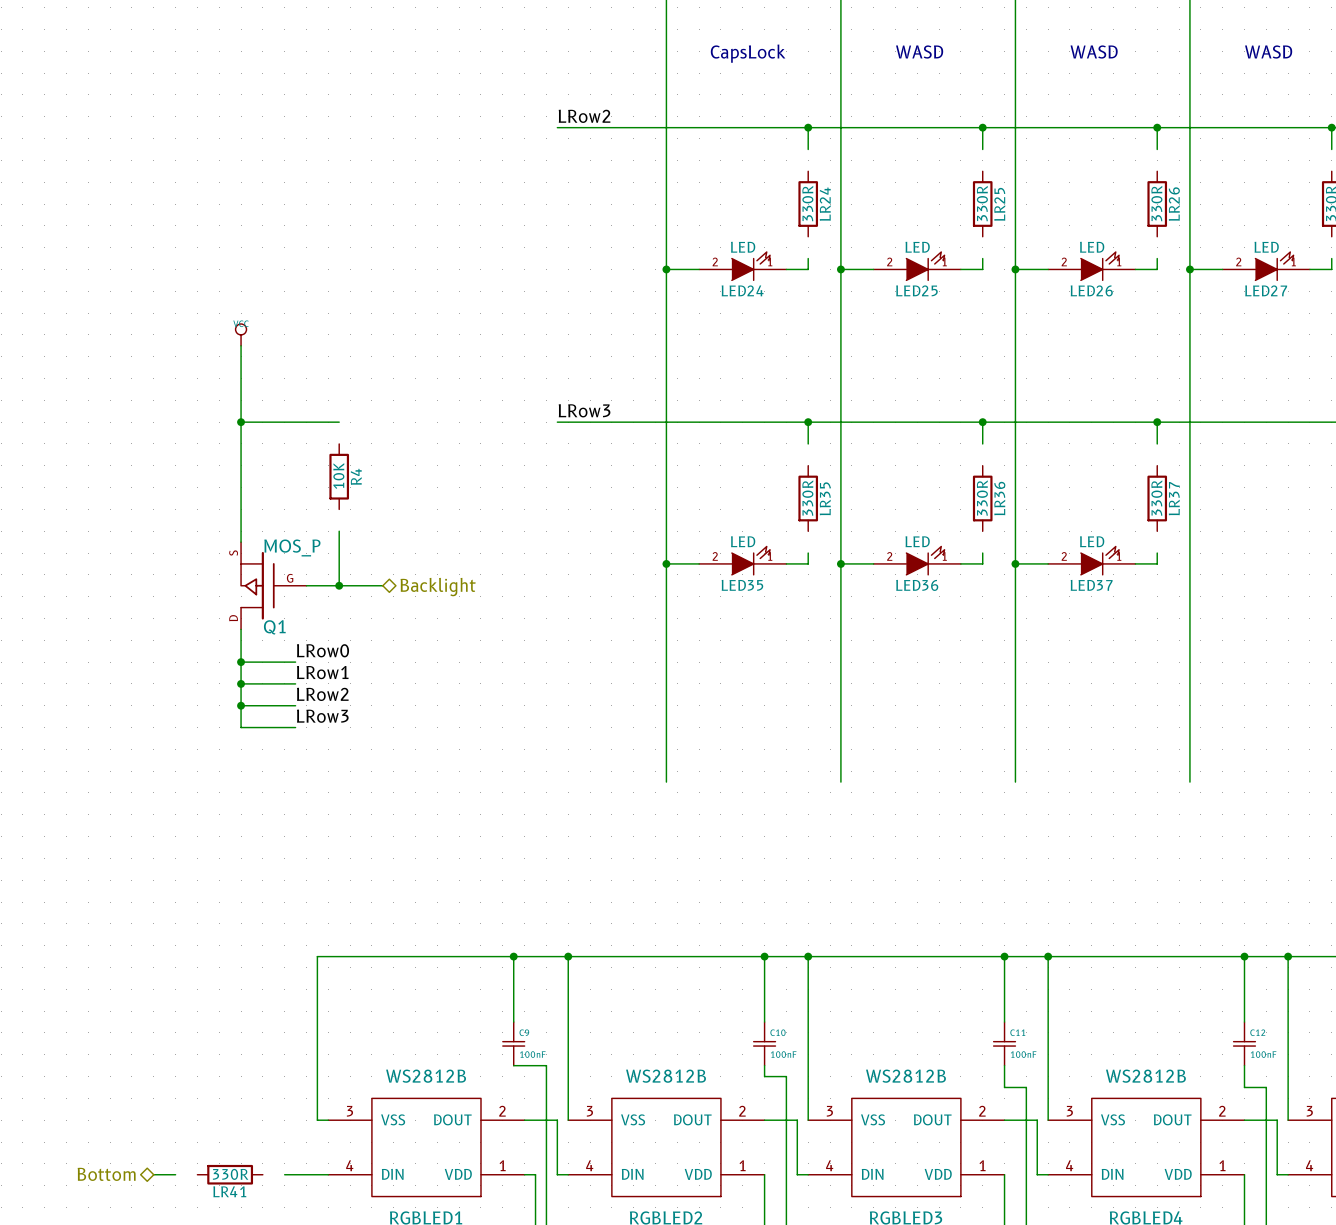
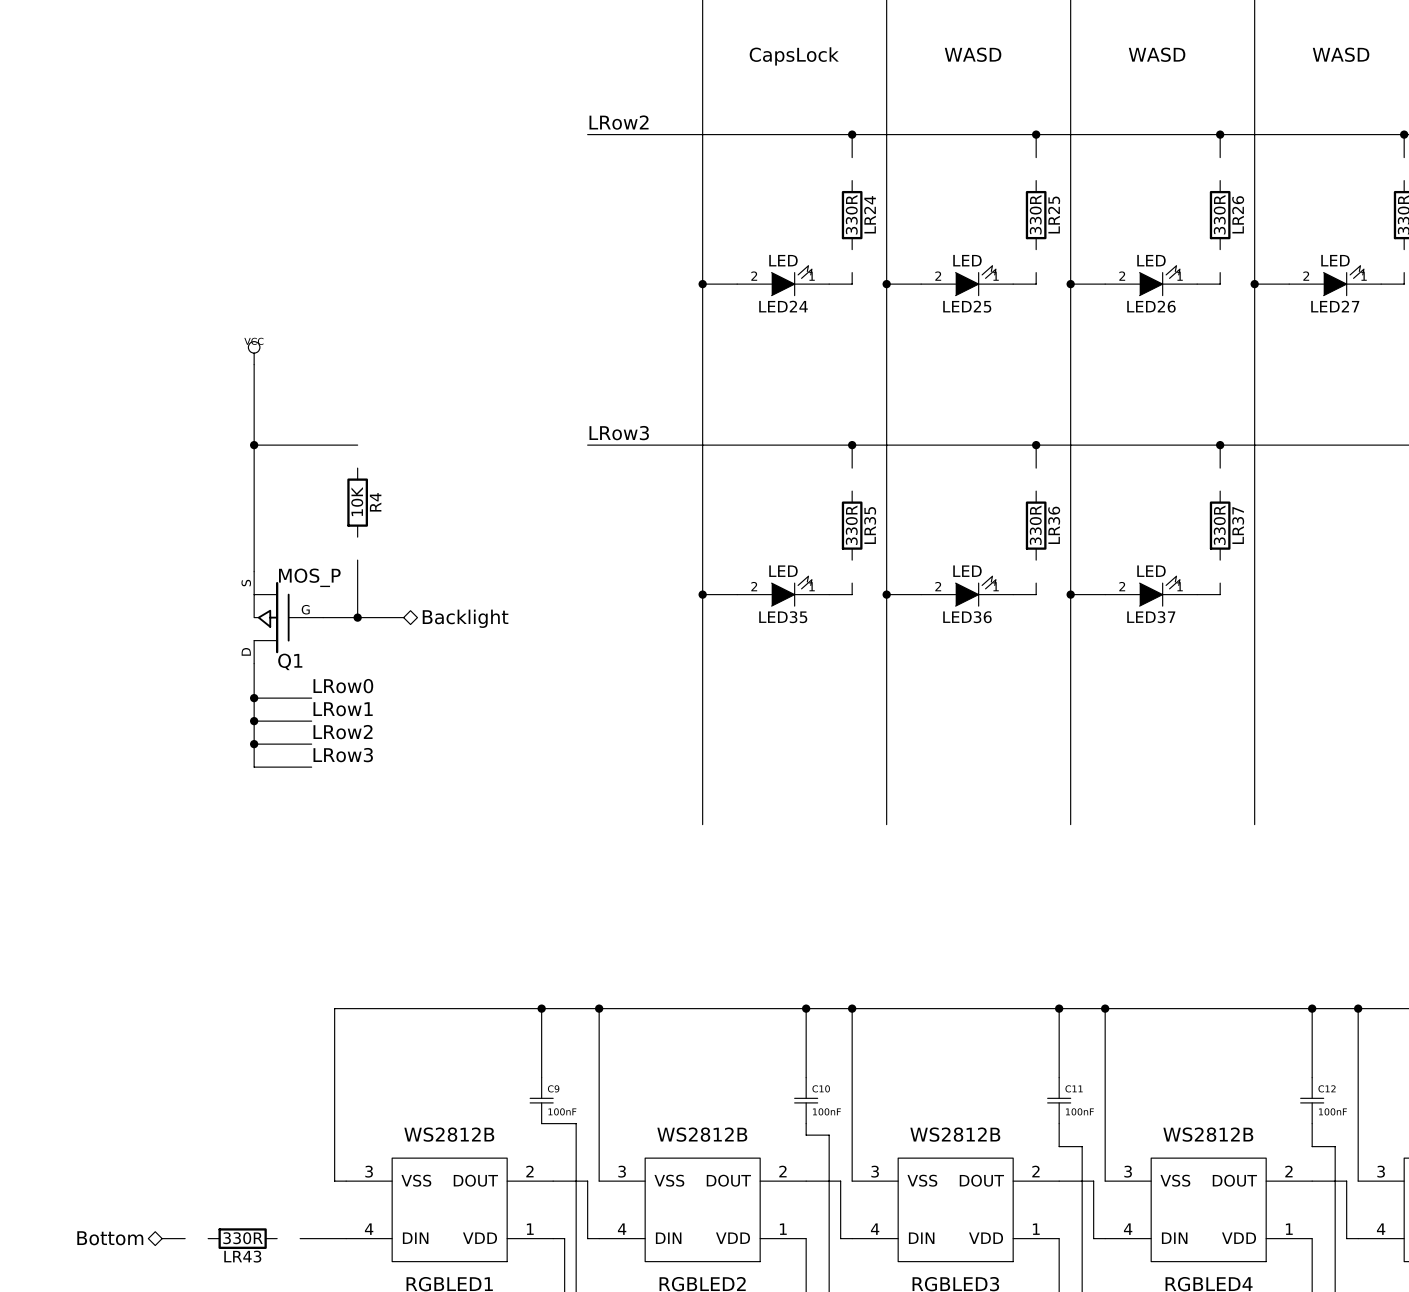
LR41 name: LR41 (229, 1191) -> LR43 (242, 1256)

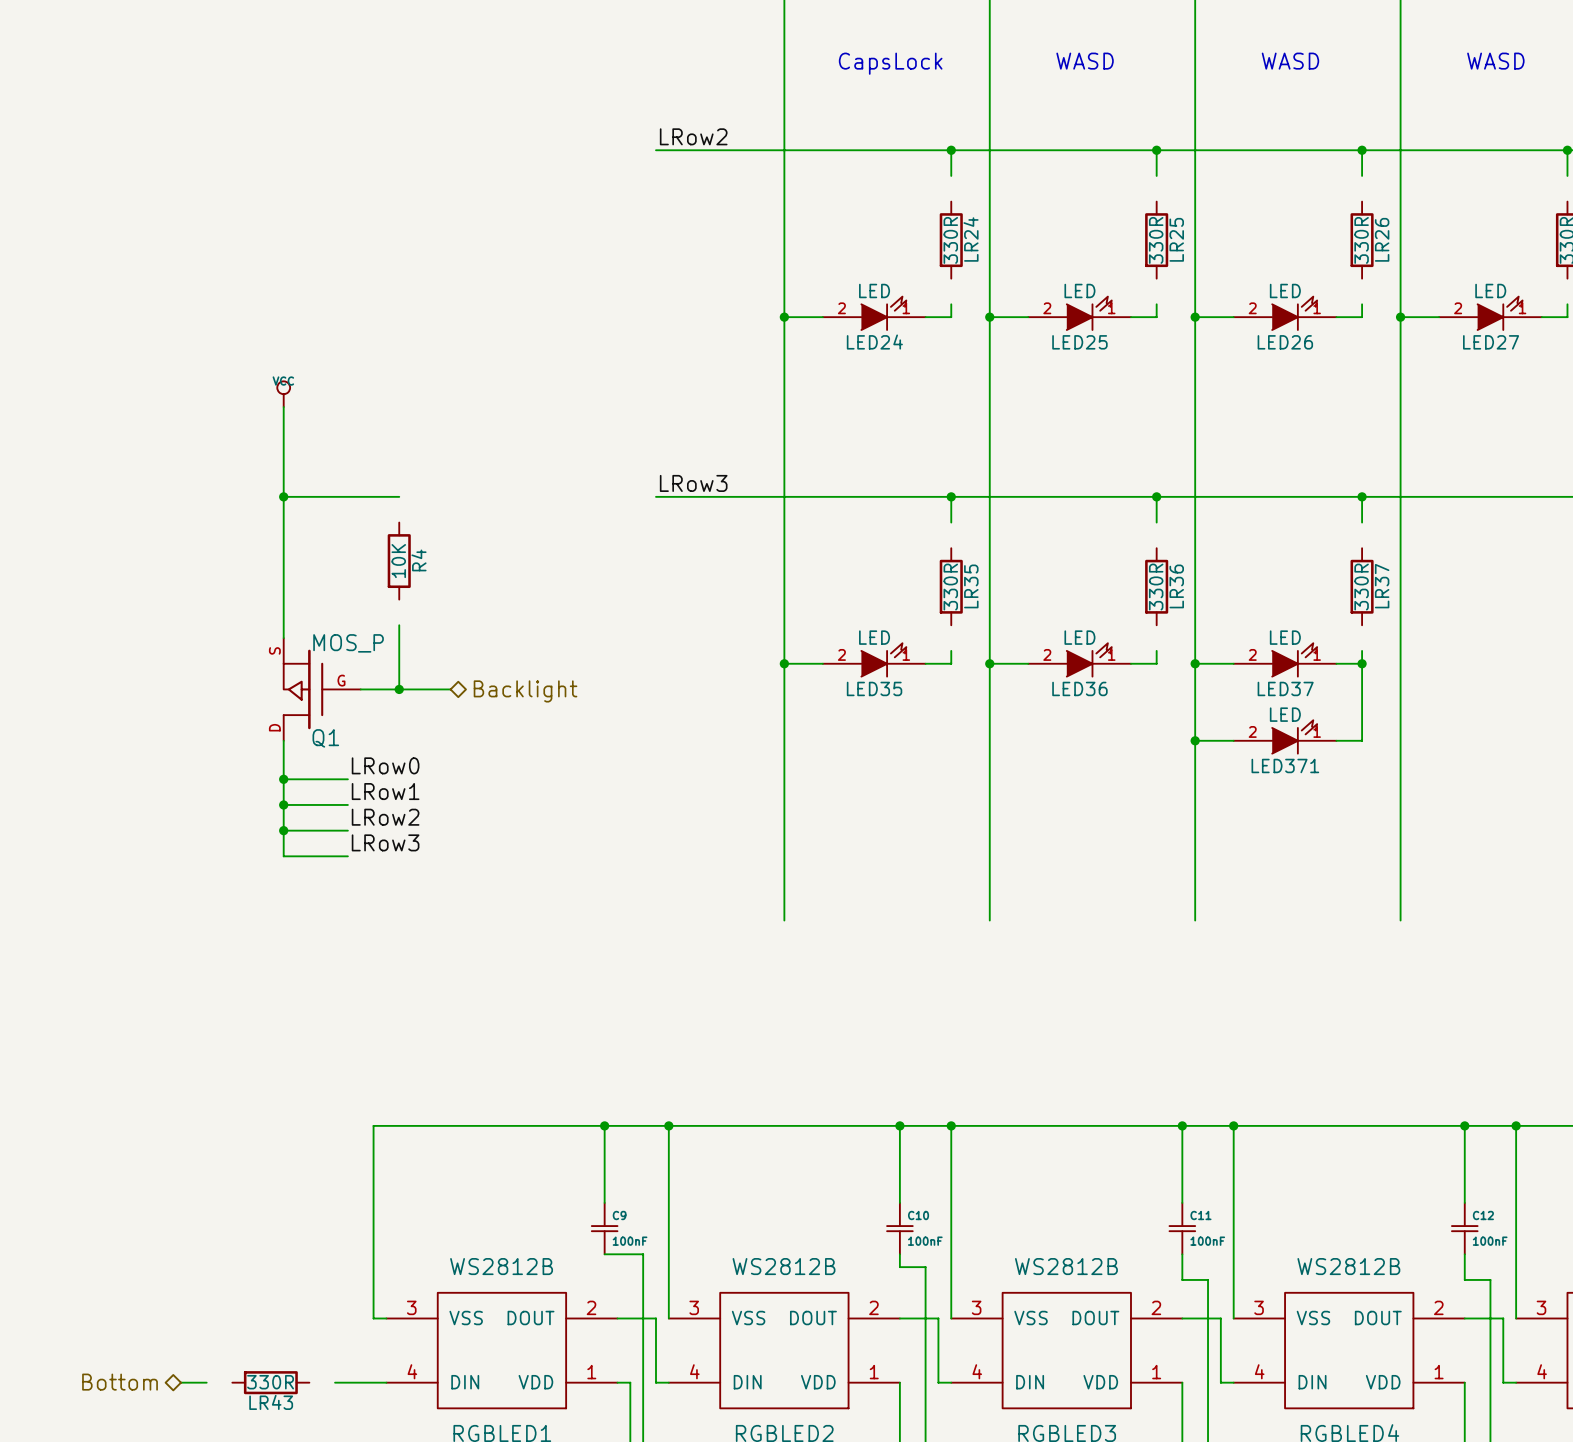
wire: none -> (1362, 663) (1362, 740) (1336, 740)
junction: none -> (1362, 663)
LED371: none -> LED (1285, 736)
wire: none -> (1195, 740) (1233, 740)
junction: none -> (1195, 740)

